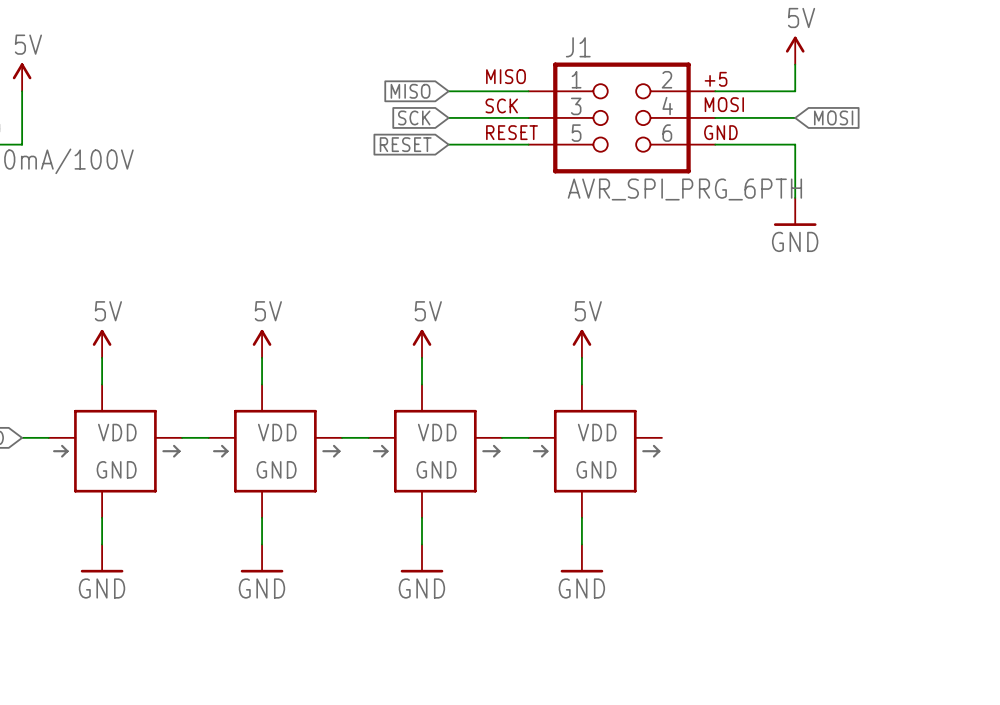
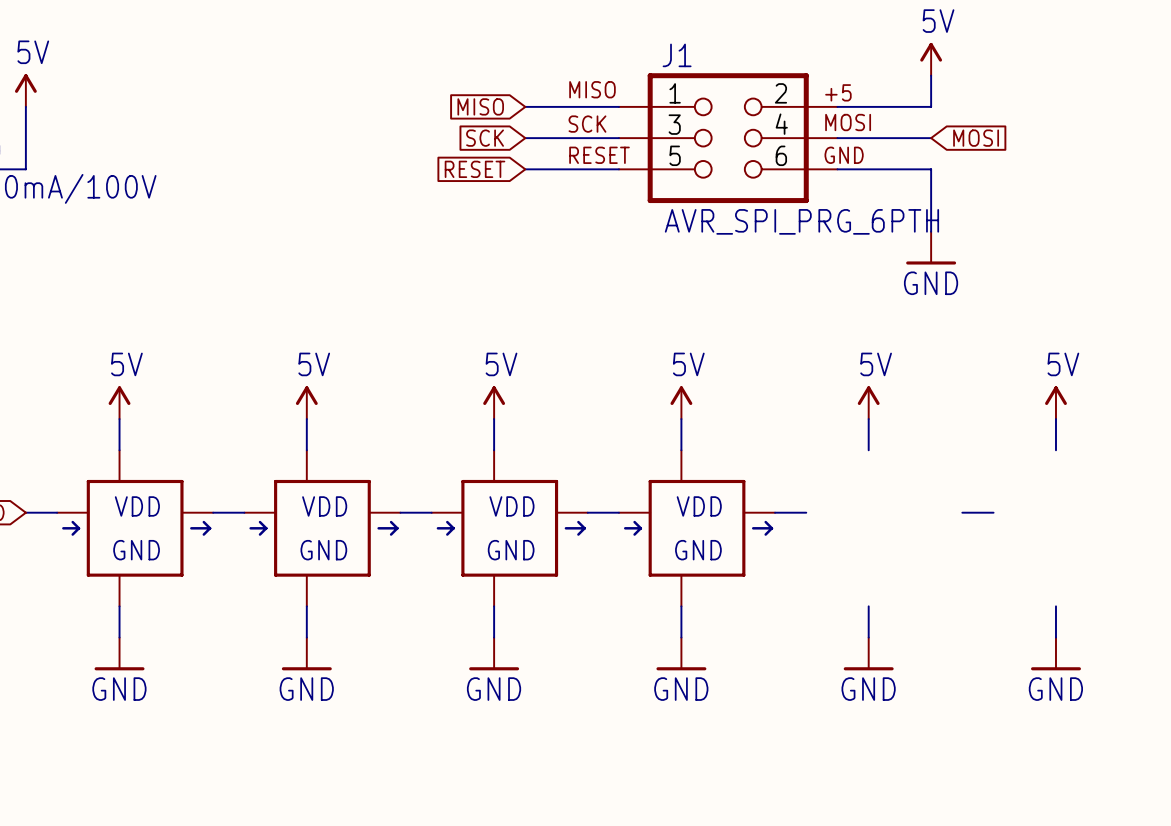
power symbol: none -> 5V (868, 402)
power symbol: none -> 5V (1055, 402)
wire: none -> (868, 419) (868, 450)
wire: none -> (1055, 419) (1055, 450)
wire: none -> (775, 512) (806, 512)
wire: none -> (962, 512) (993, 512)
wire: none -> (868, 606) (868, 637)
wire: none -> (1055, 606) (1055, 637)
power symbol: none -> GND (868, 653)
power symbol: none -> GND (1055, 653)

